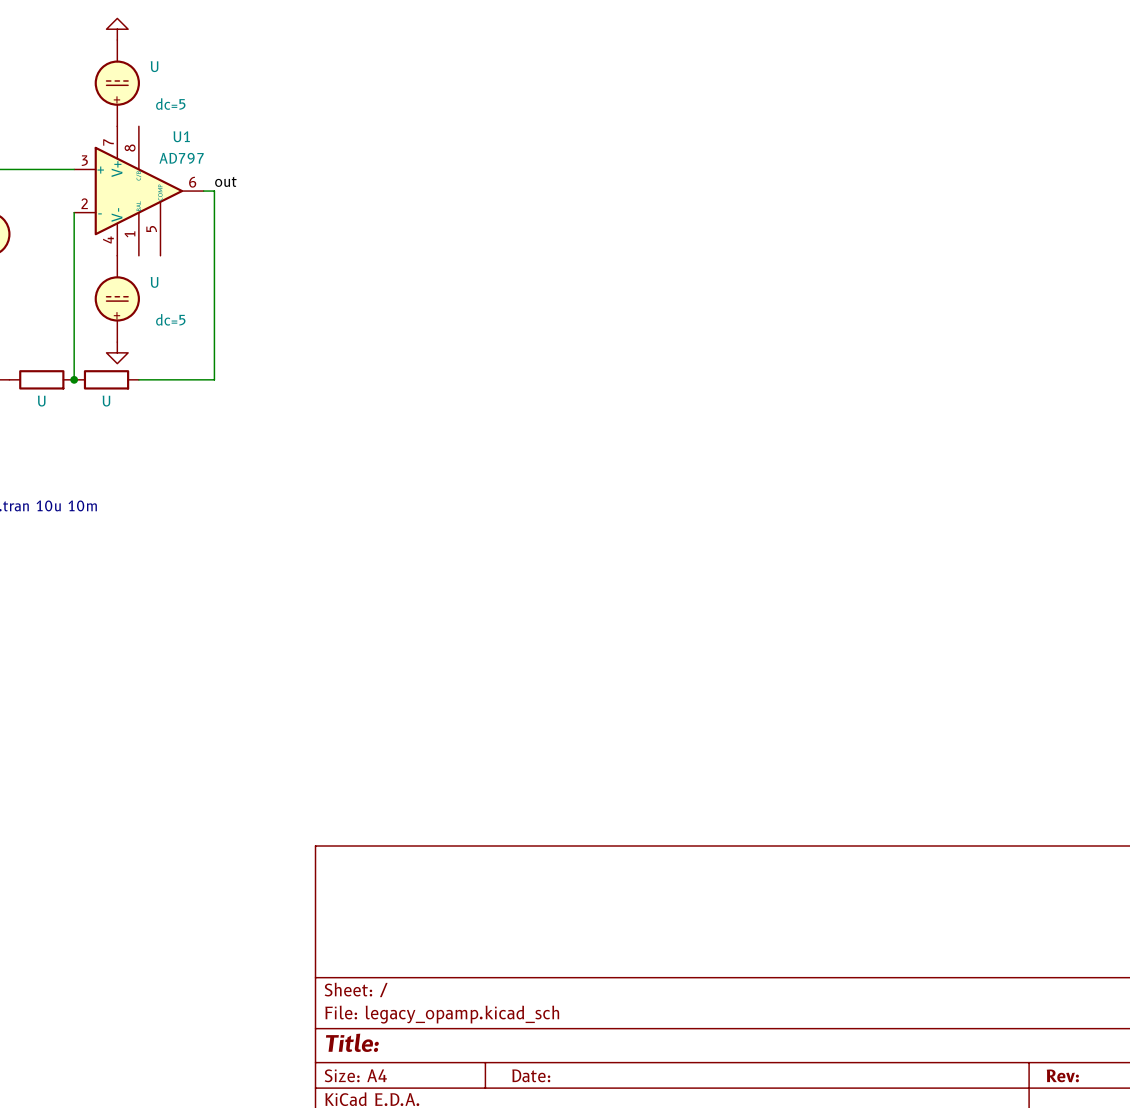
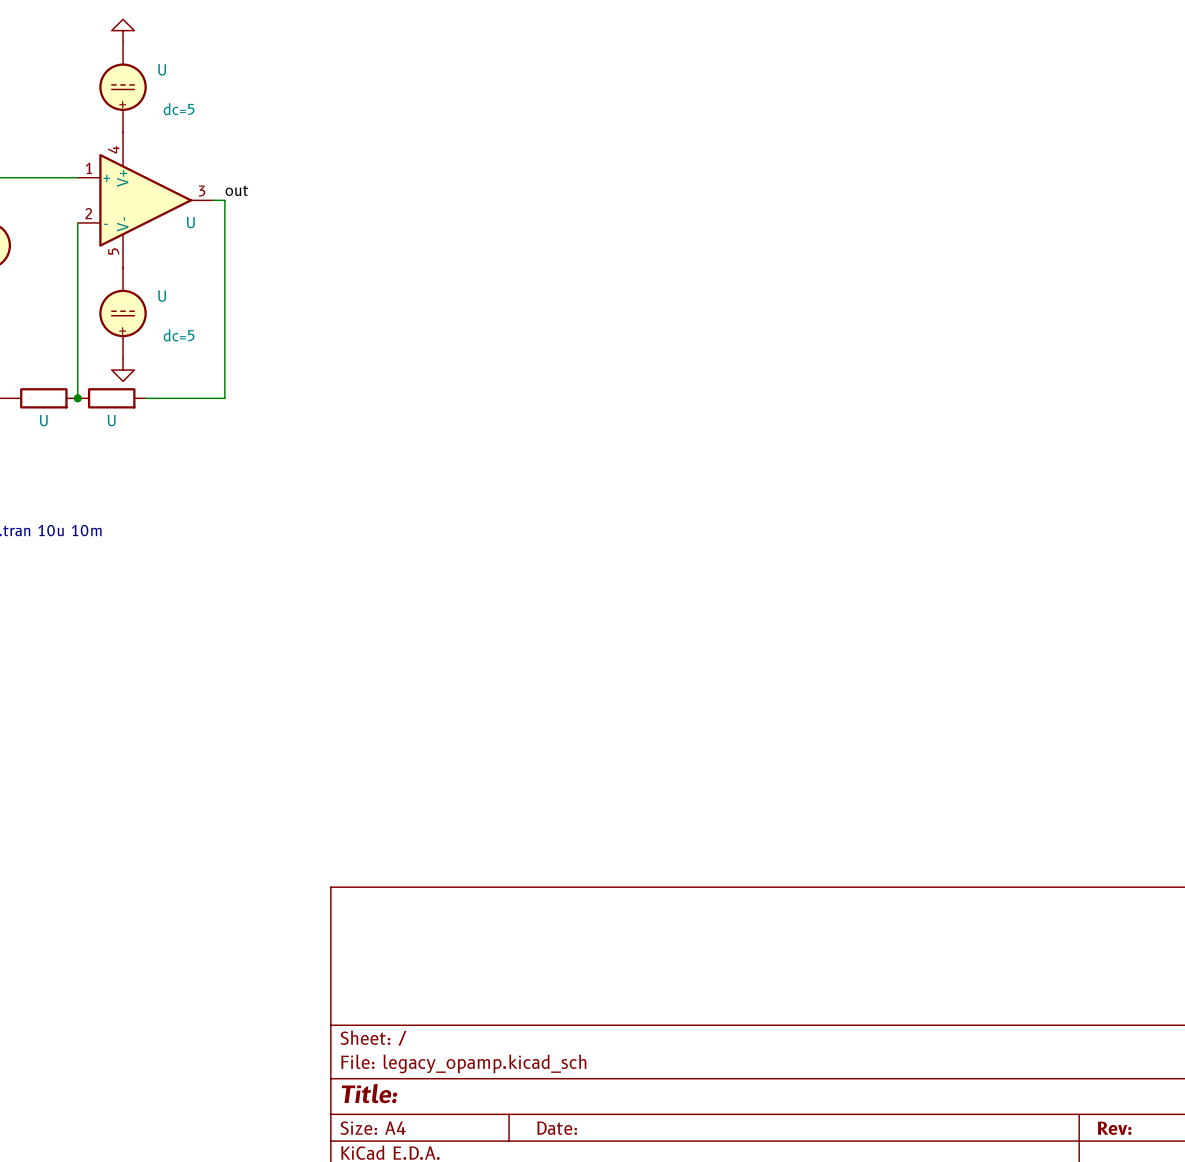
U1: AD797 (138, 191) -> none
U: none -> (145, 200)

